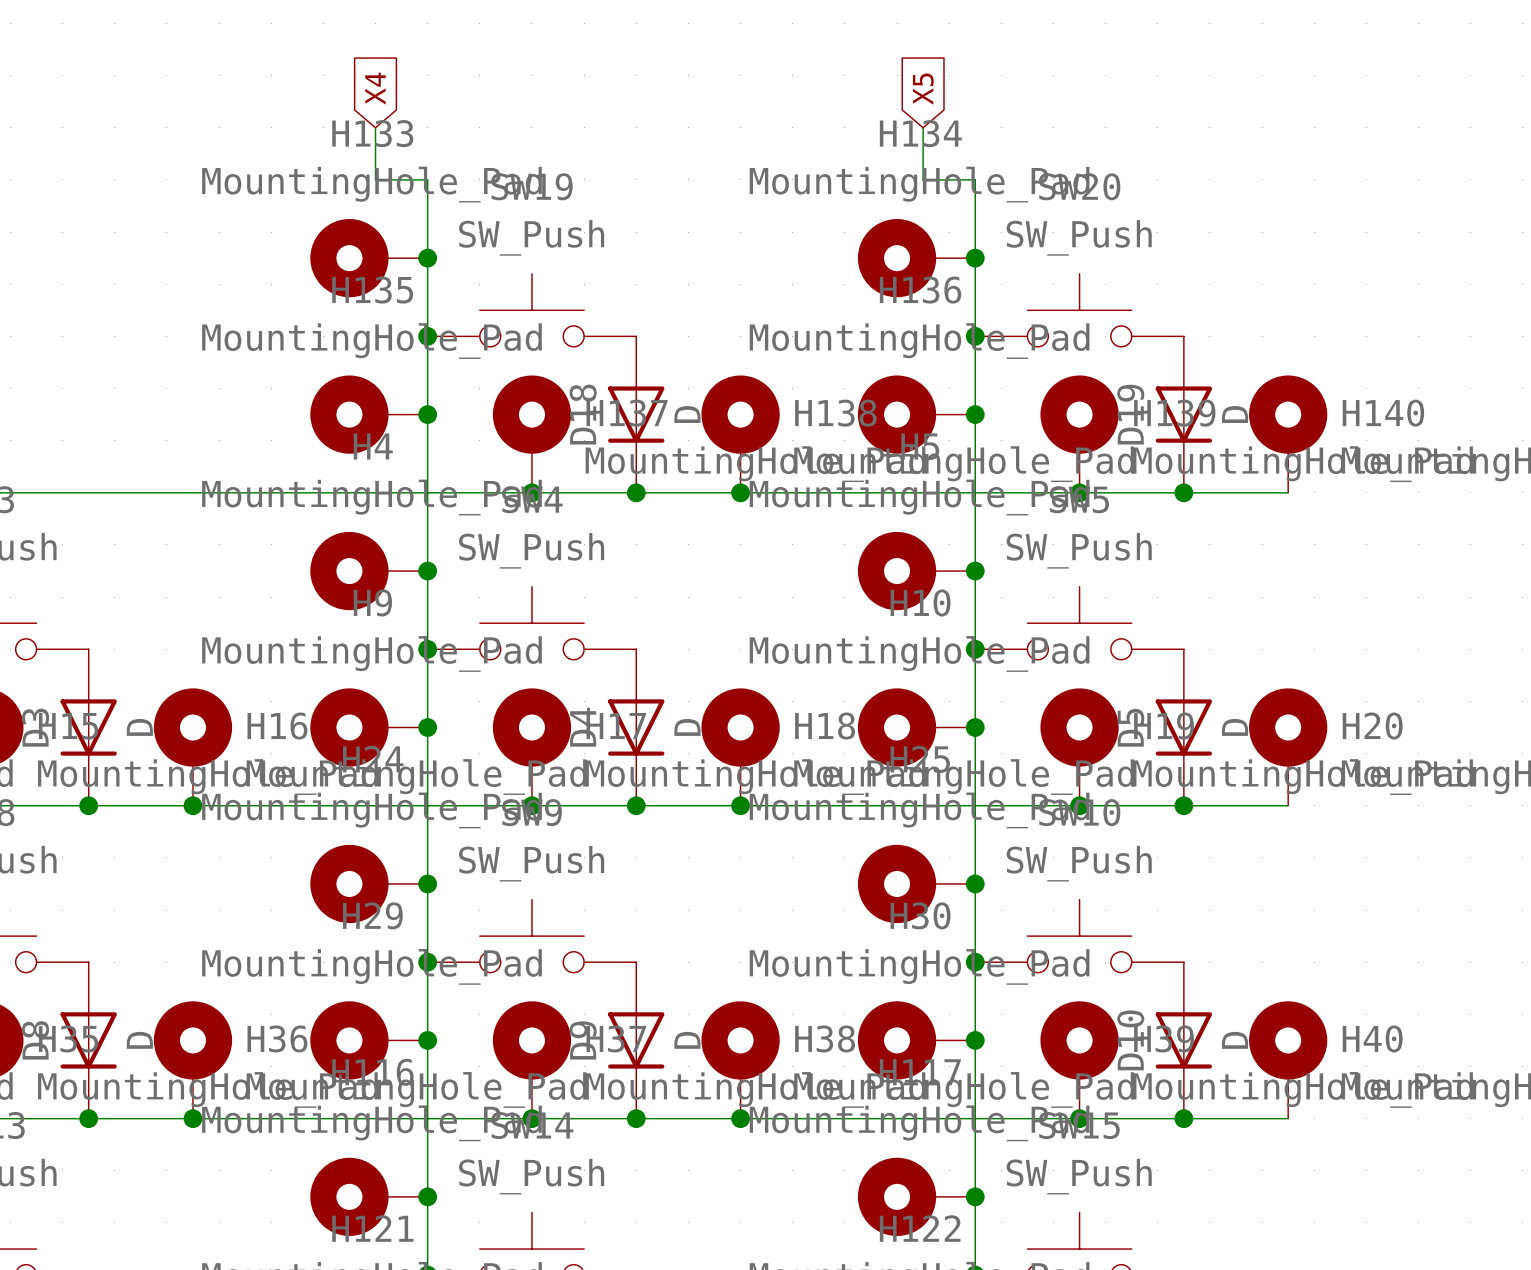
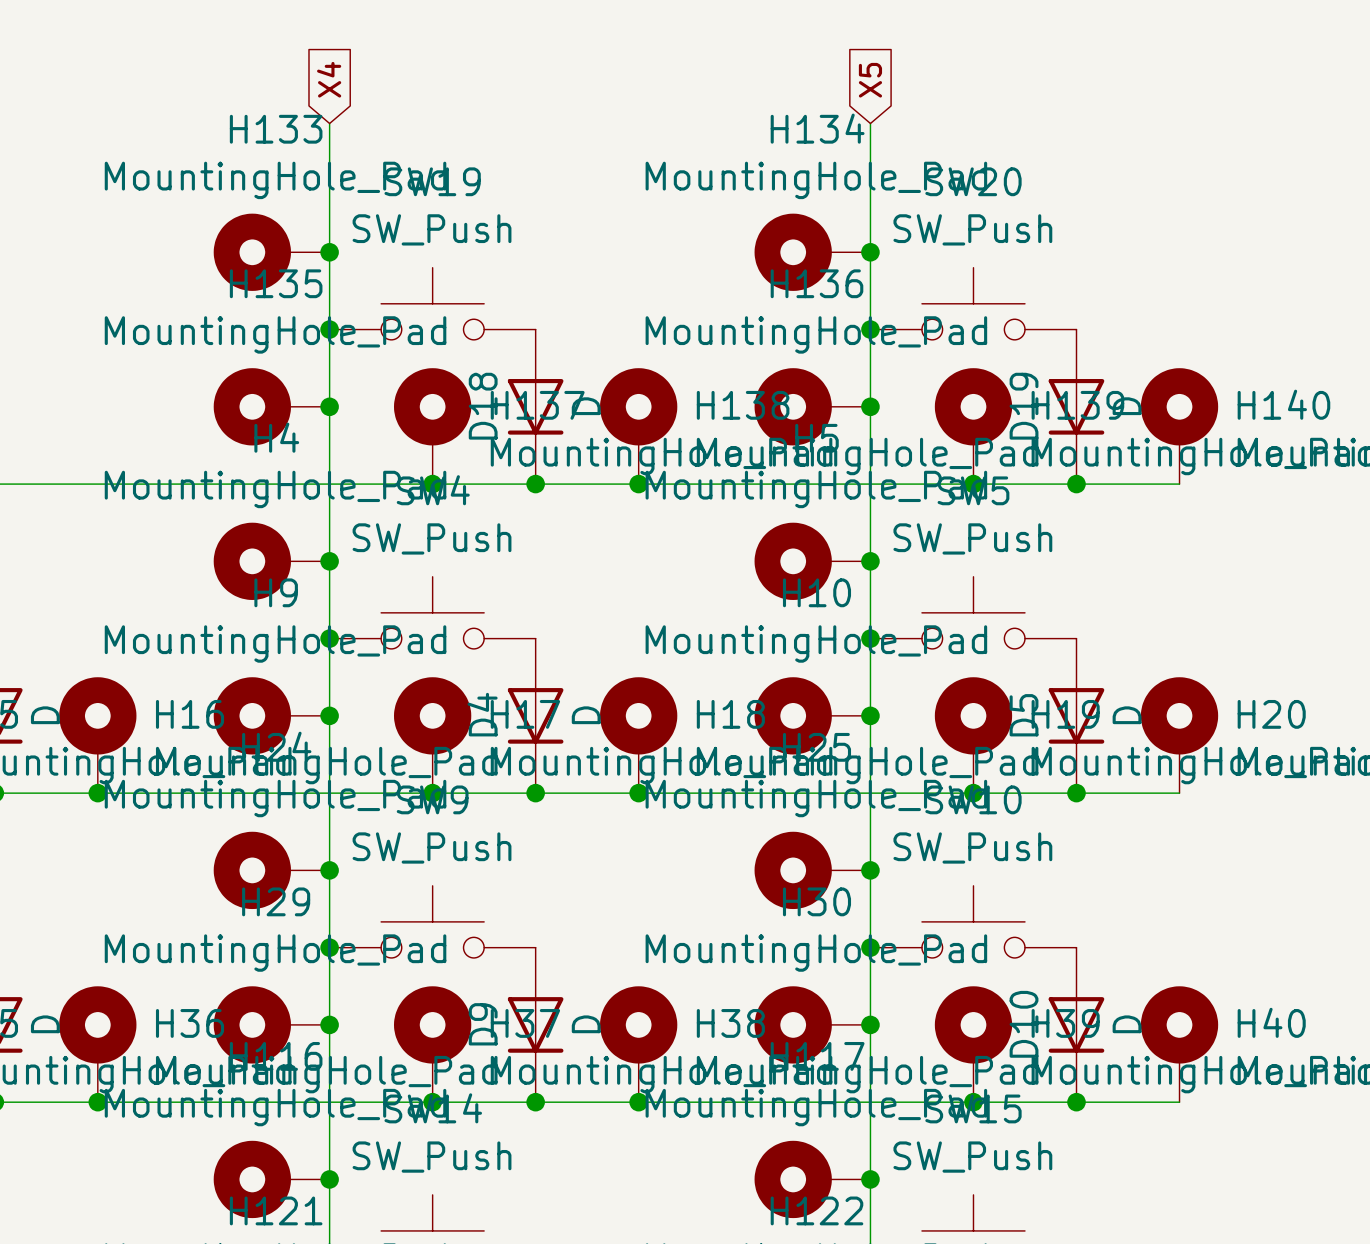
global label position: X4 (375, 88) -> X4 (329, 79)
global label position: X5 (923, 89) -> X5 (870, 80)
wire: (375, 127) (375, 179) (427, 179) -> (329, 123) (329, 175)
wire: (923, 127) (923, 179) (975, 179) -> (870, 123) (870, 175)

